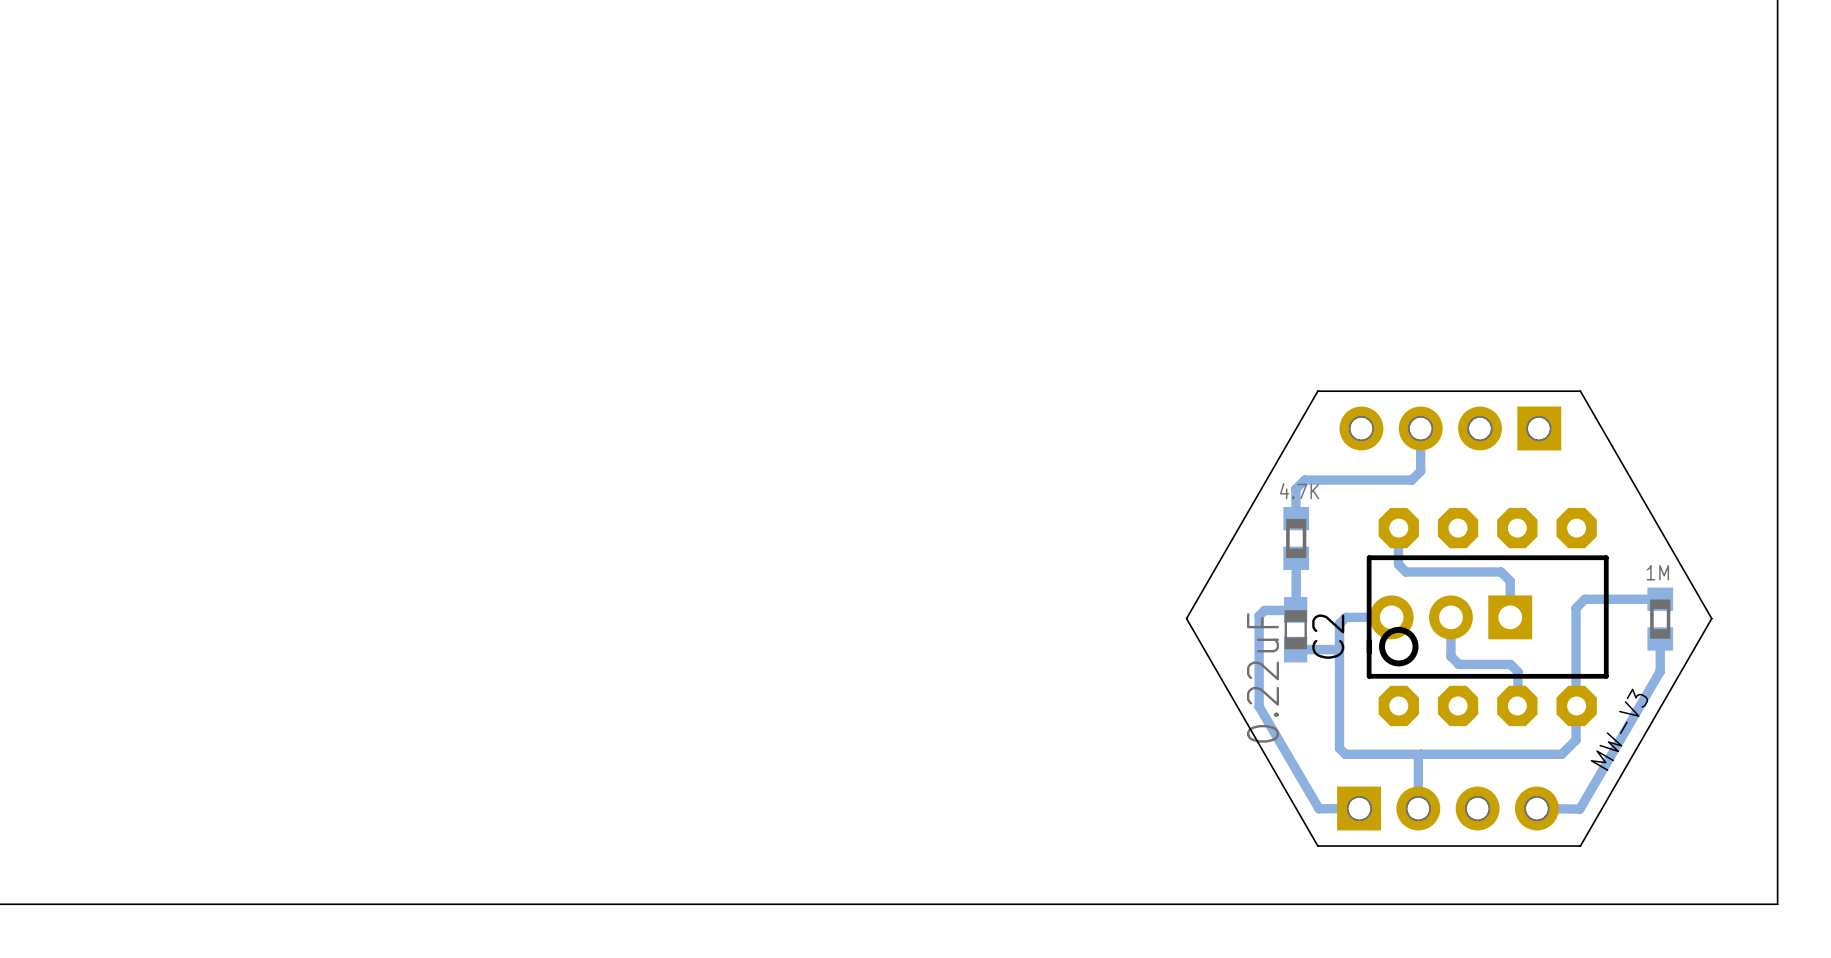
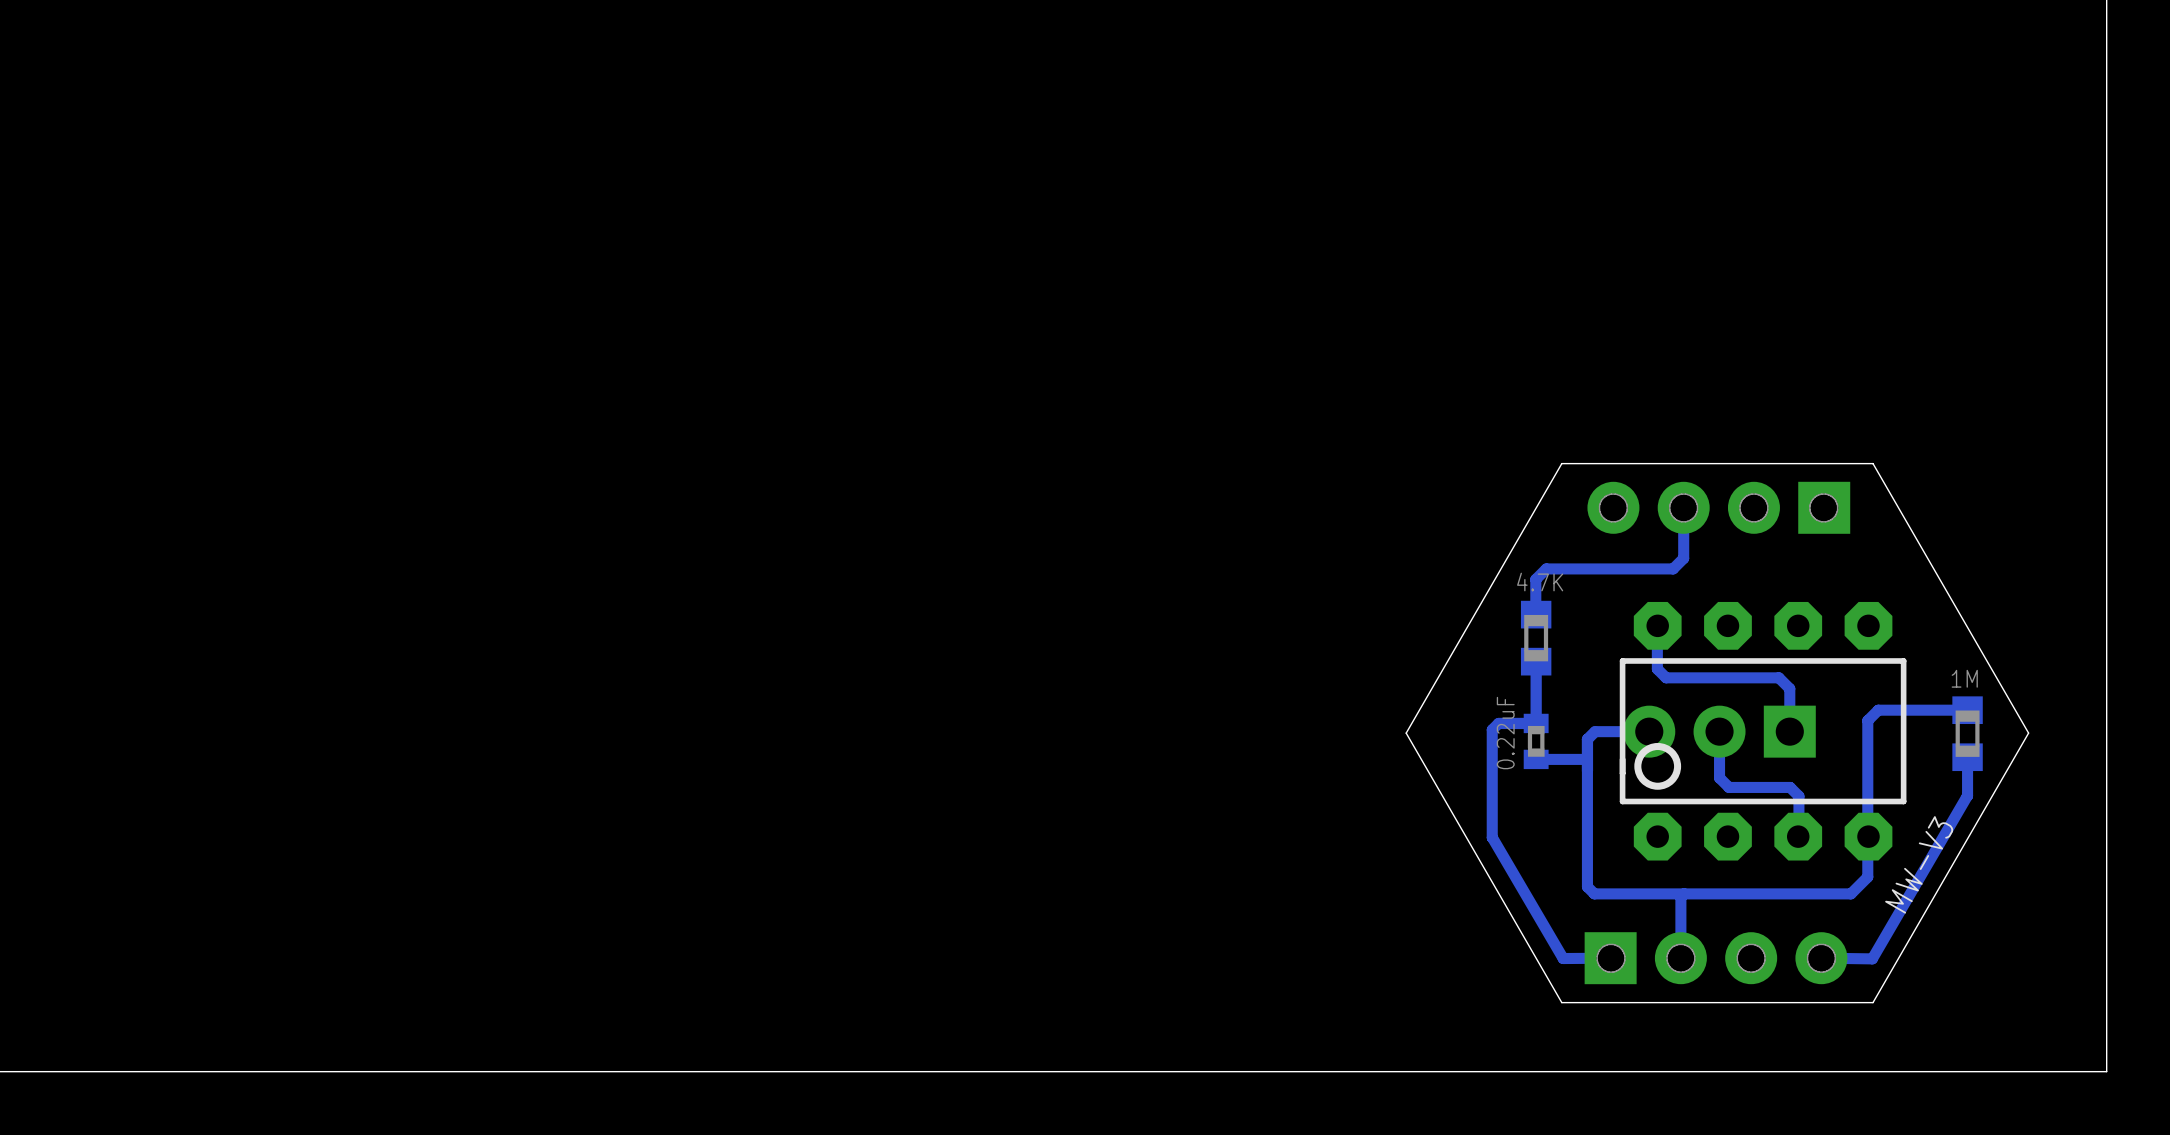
part: none -> 0.22uF (1536, 741)
C2: 0.22uF (1295, 629) -> none
track: none -> (1536, 759) (1585, 759) (1587, 761)
track: (1339, 647) (1337, 649) (1295, 649) -> none

